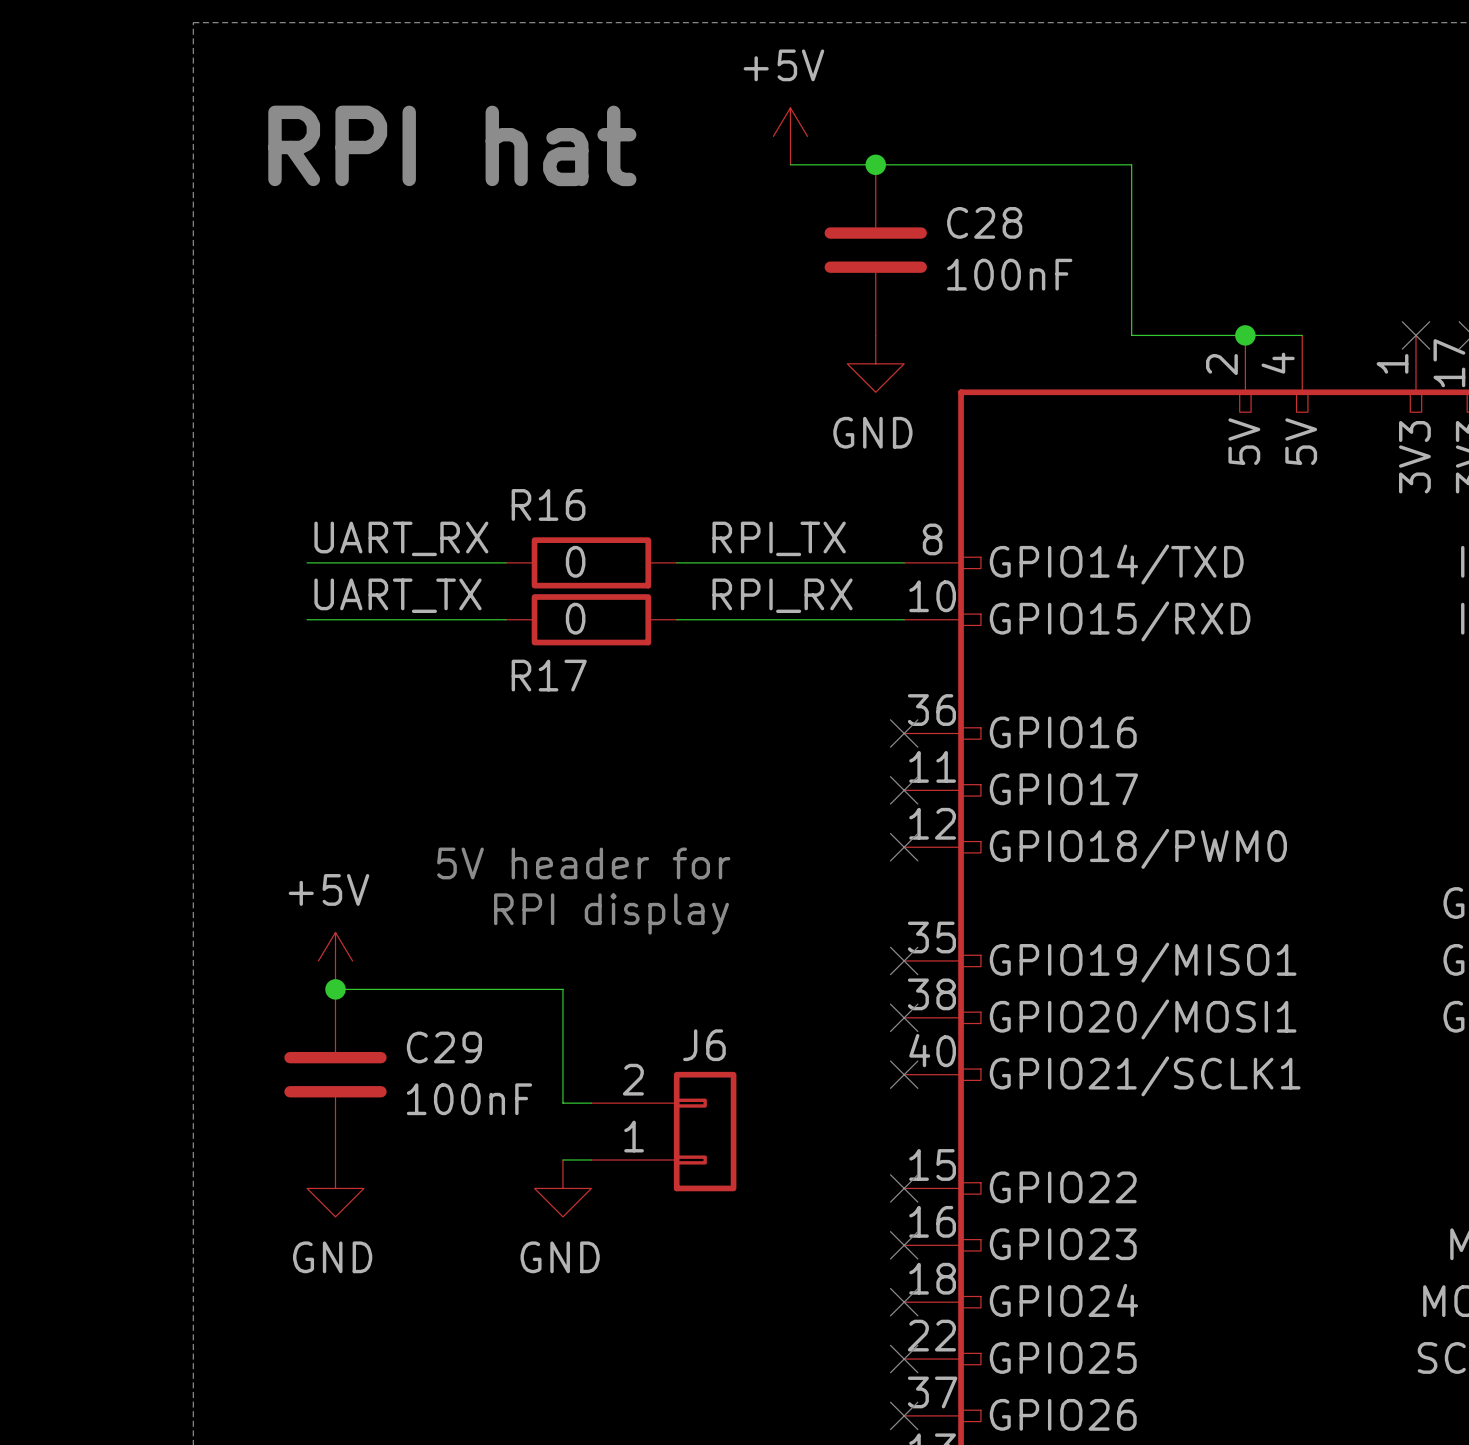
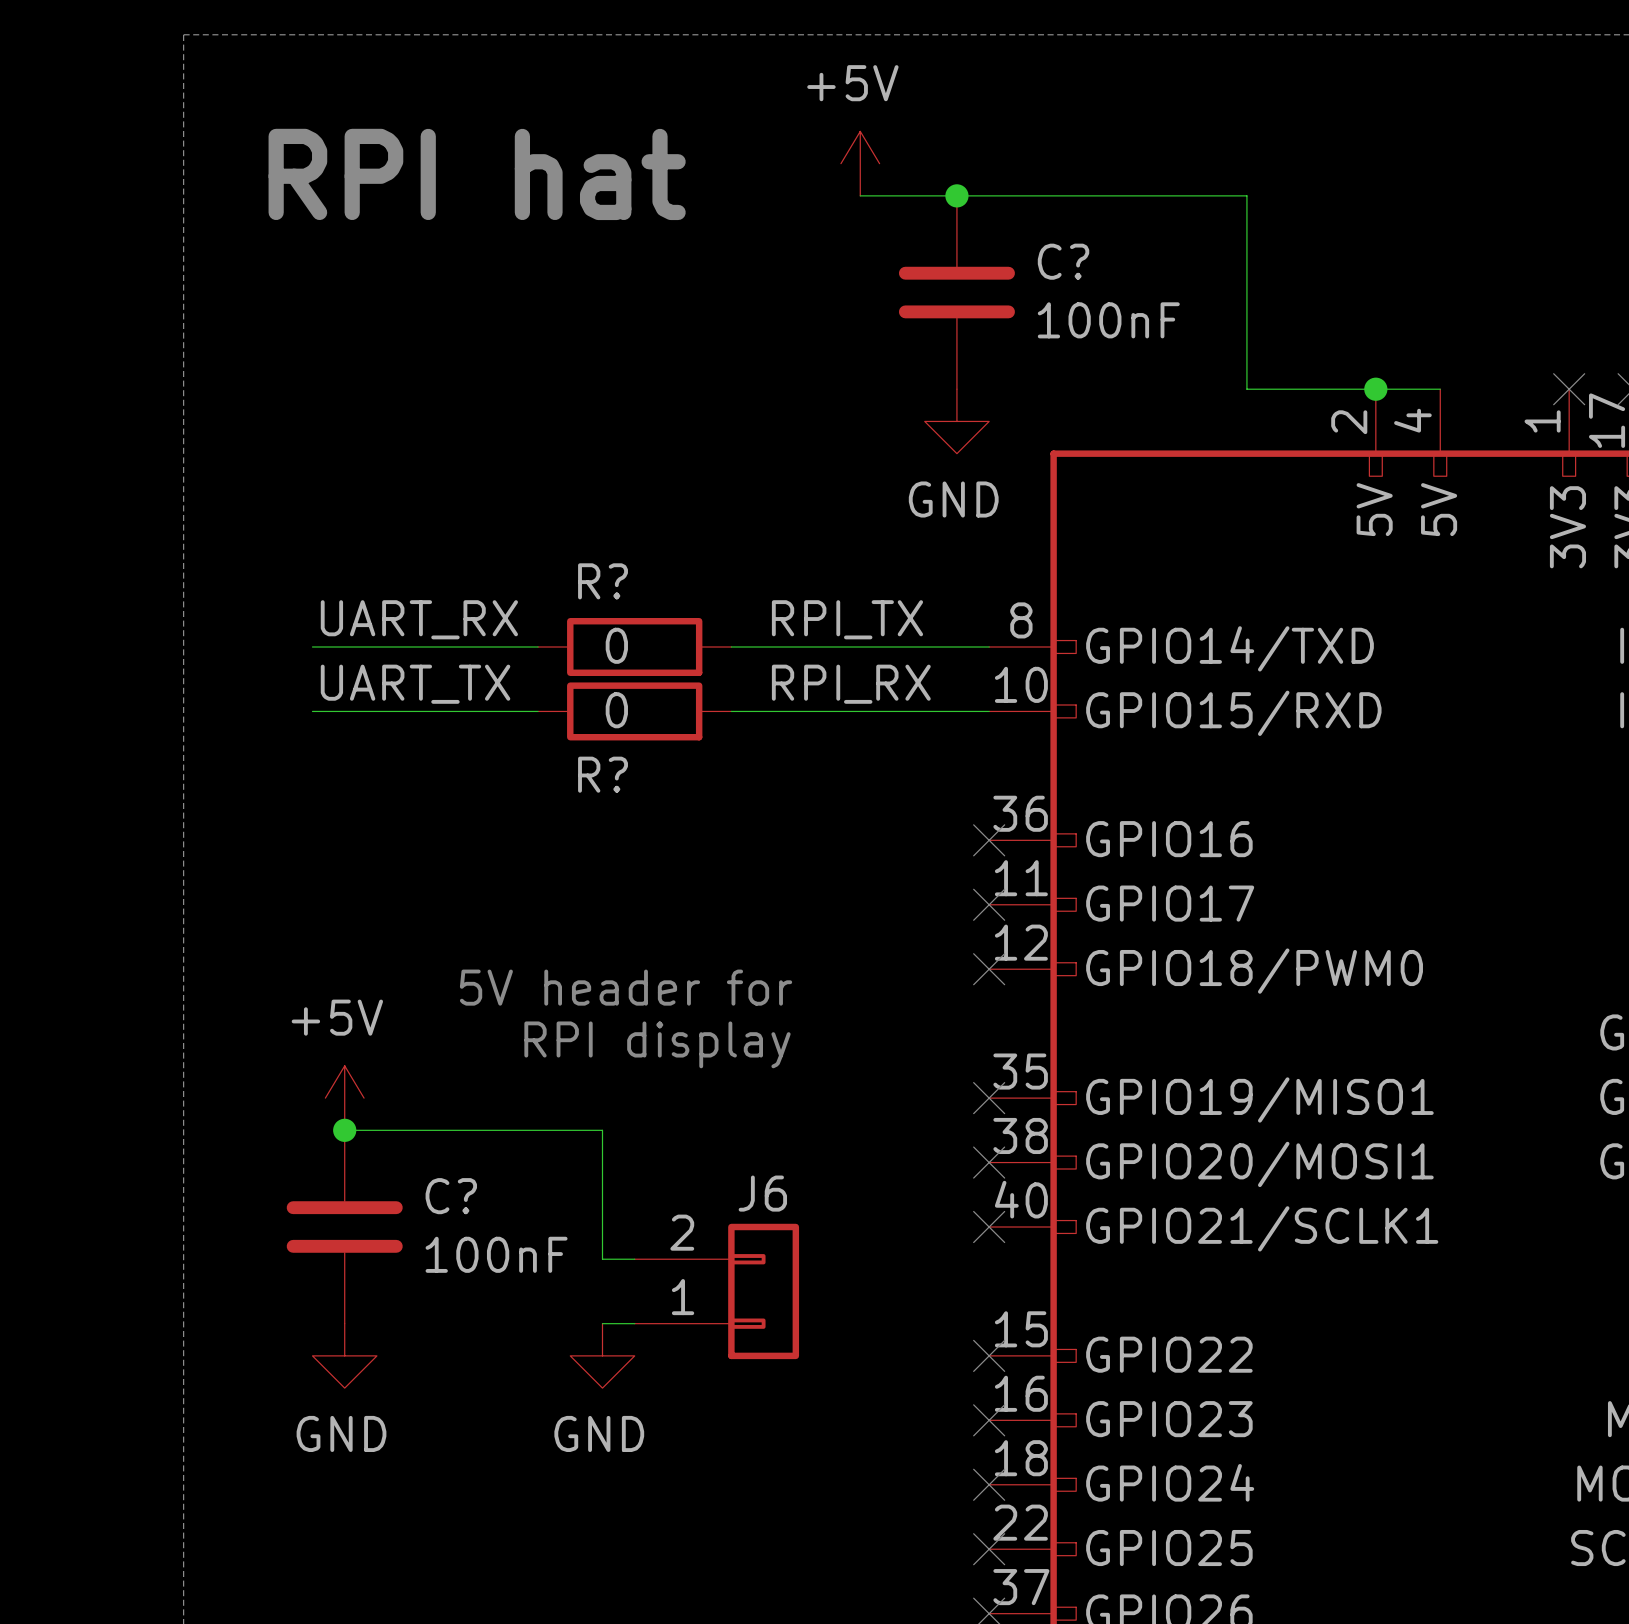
C28 name: C28 (984, 222) -> C? (1063, 261)
R16 name: R16 (548, 504) -> R? (603, 581)
R17 name: R17 (549, 675) -> R? (603, 774)
C29 name: C29 (444, 1047) -> C? (451, 1196)

